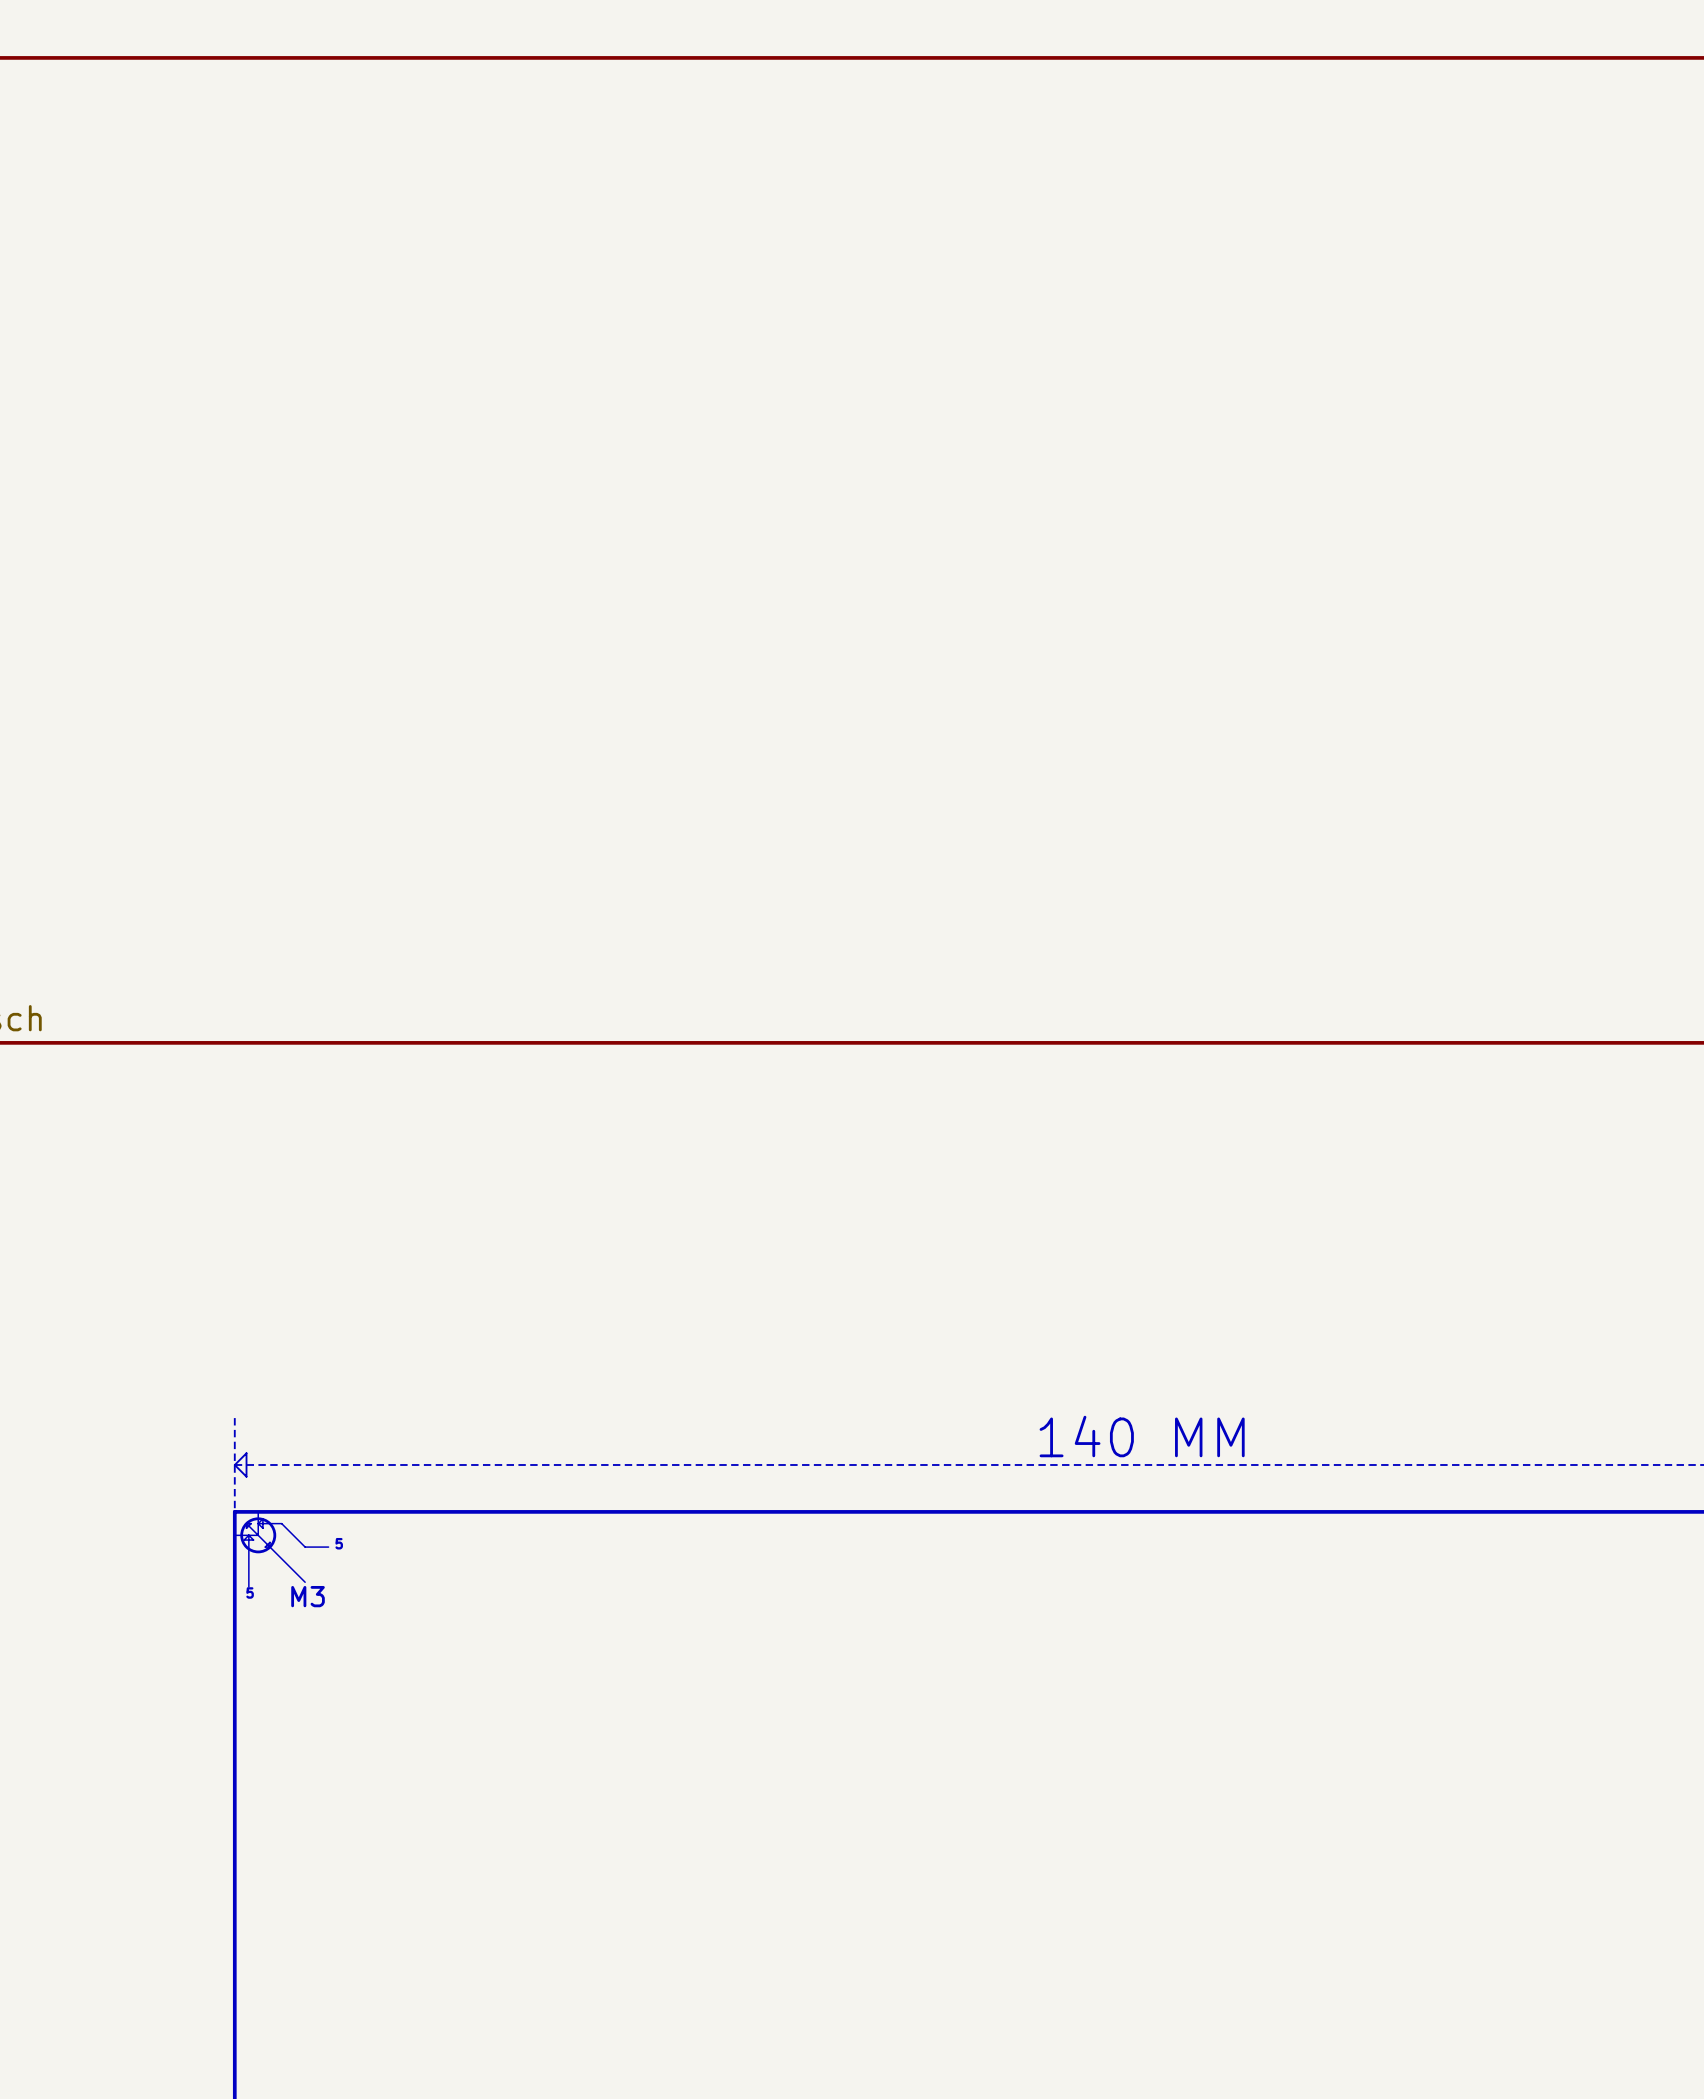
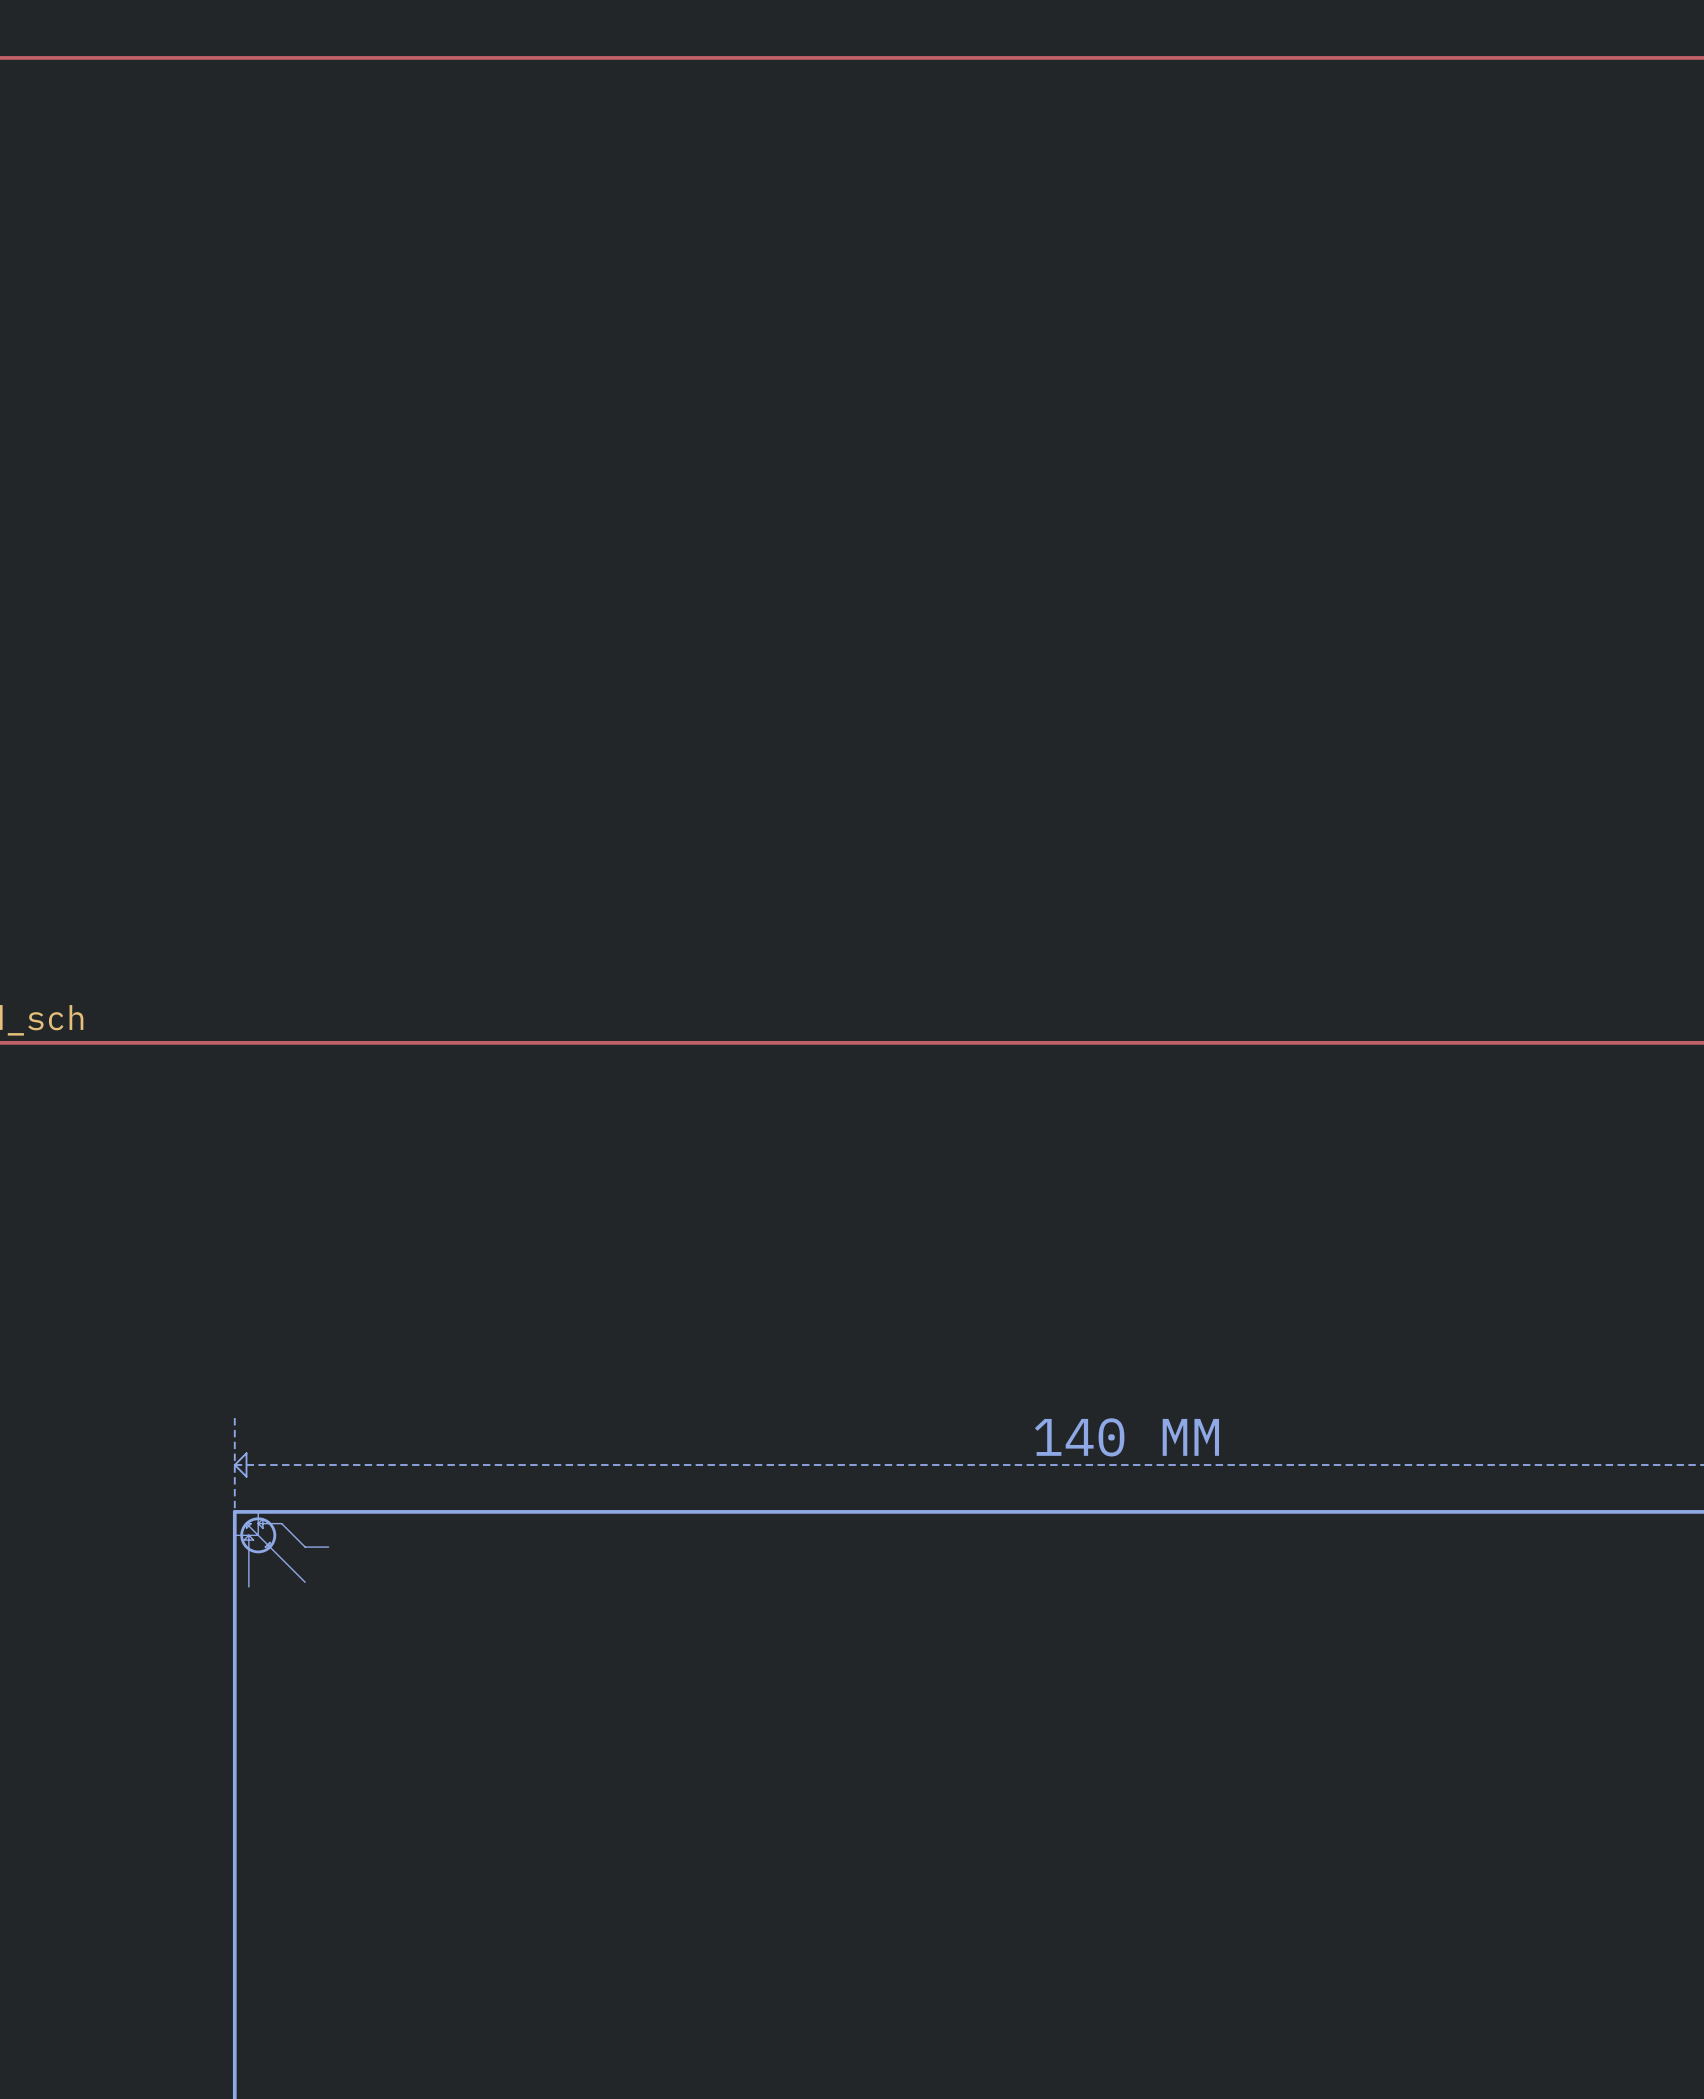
text: 5 (339, 1543) -> none
text: 5 (250, 1592) -> none
text: M3 (308, 1596) -> none

